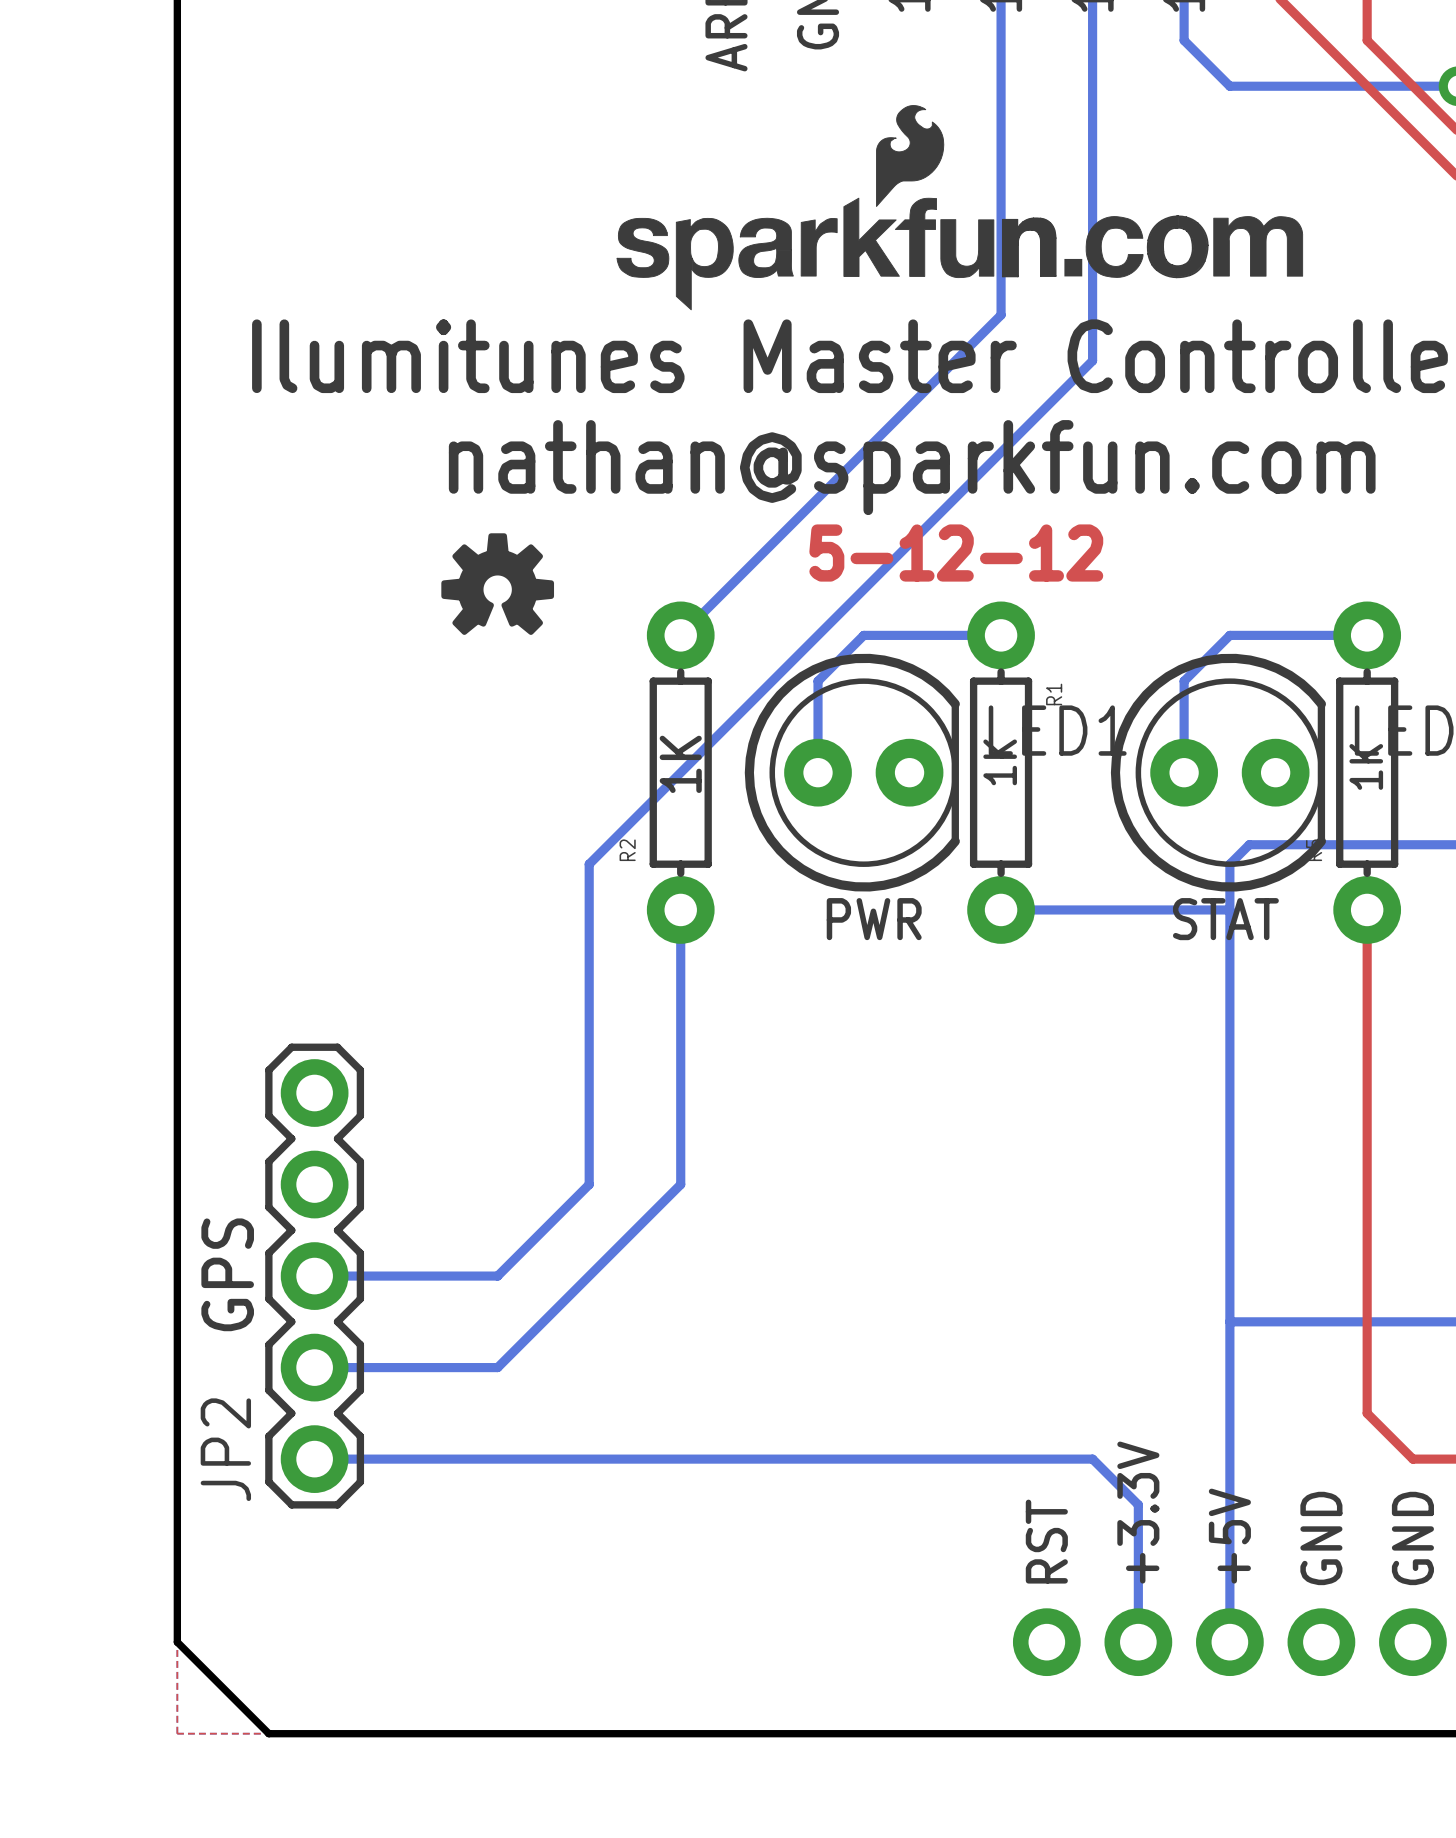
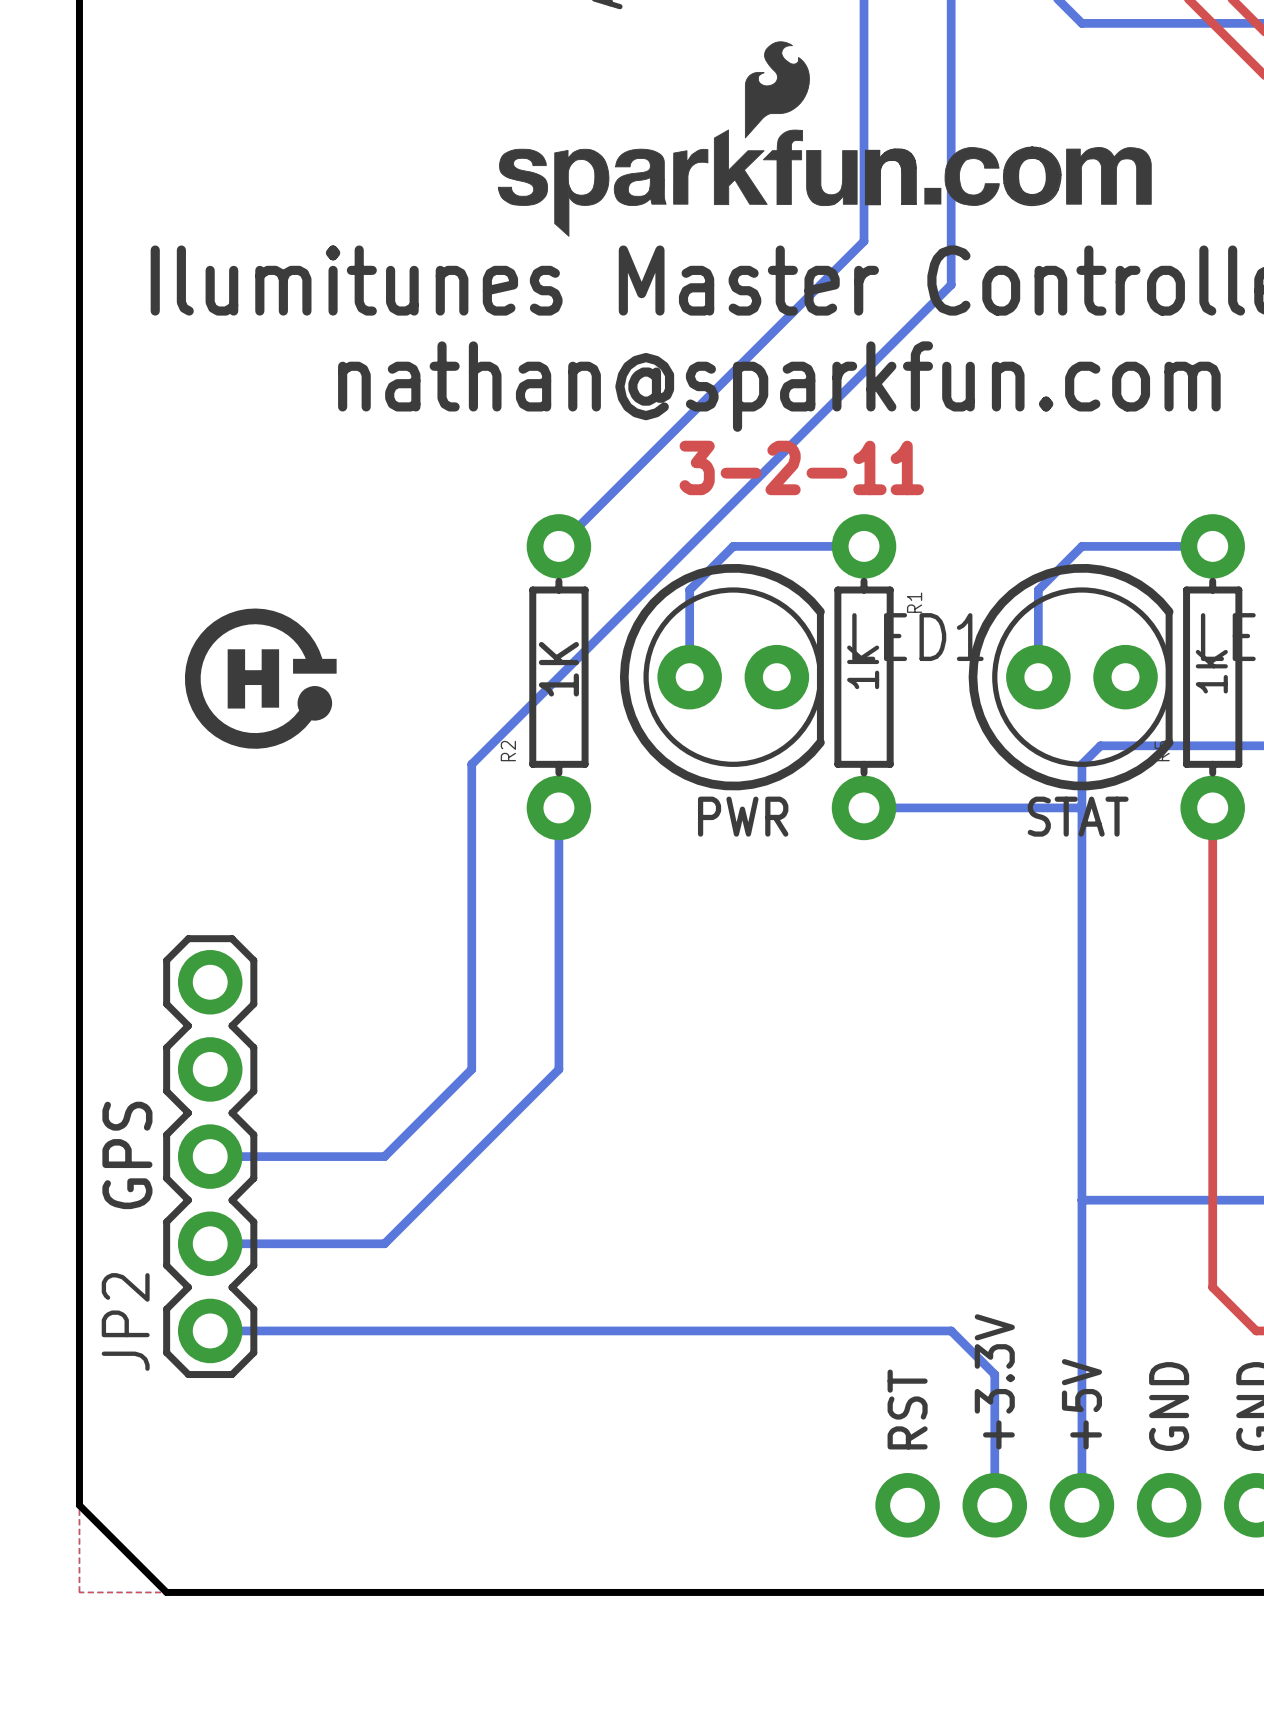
drawing: [441, 533, 555, 635] -> none
text: 5-12-12 (956, 553) -> 3-2-11 (801, 467)
drawing: none -> [185, 608, 337, 749]

